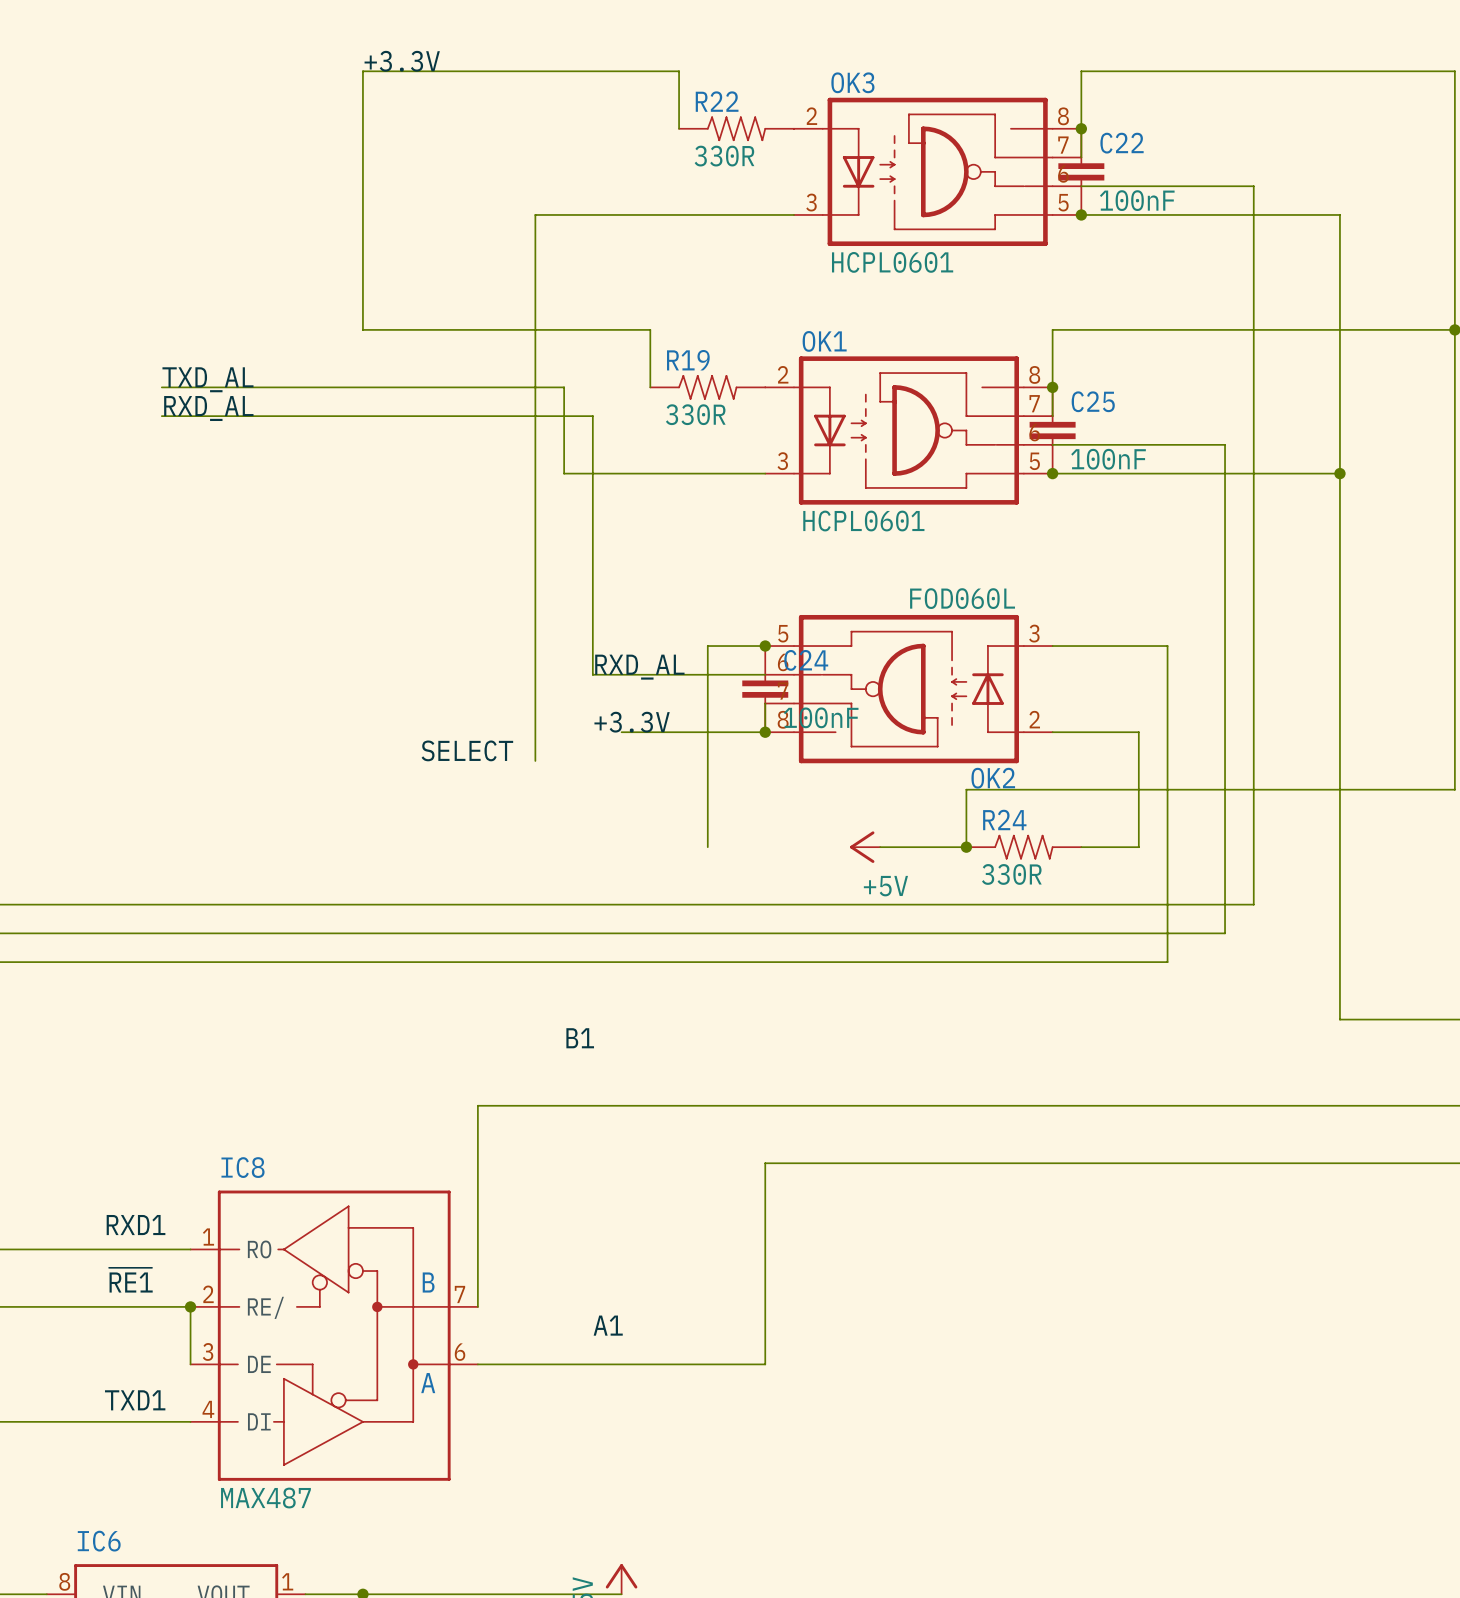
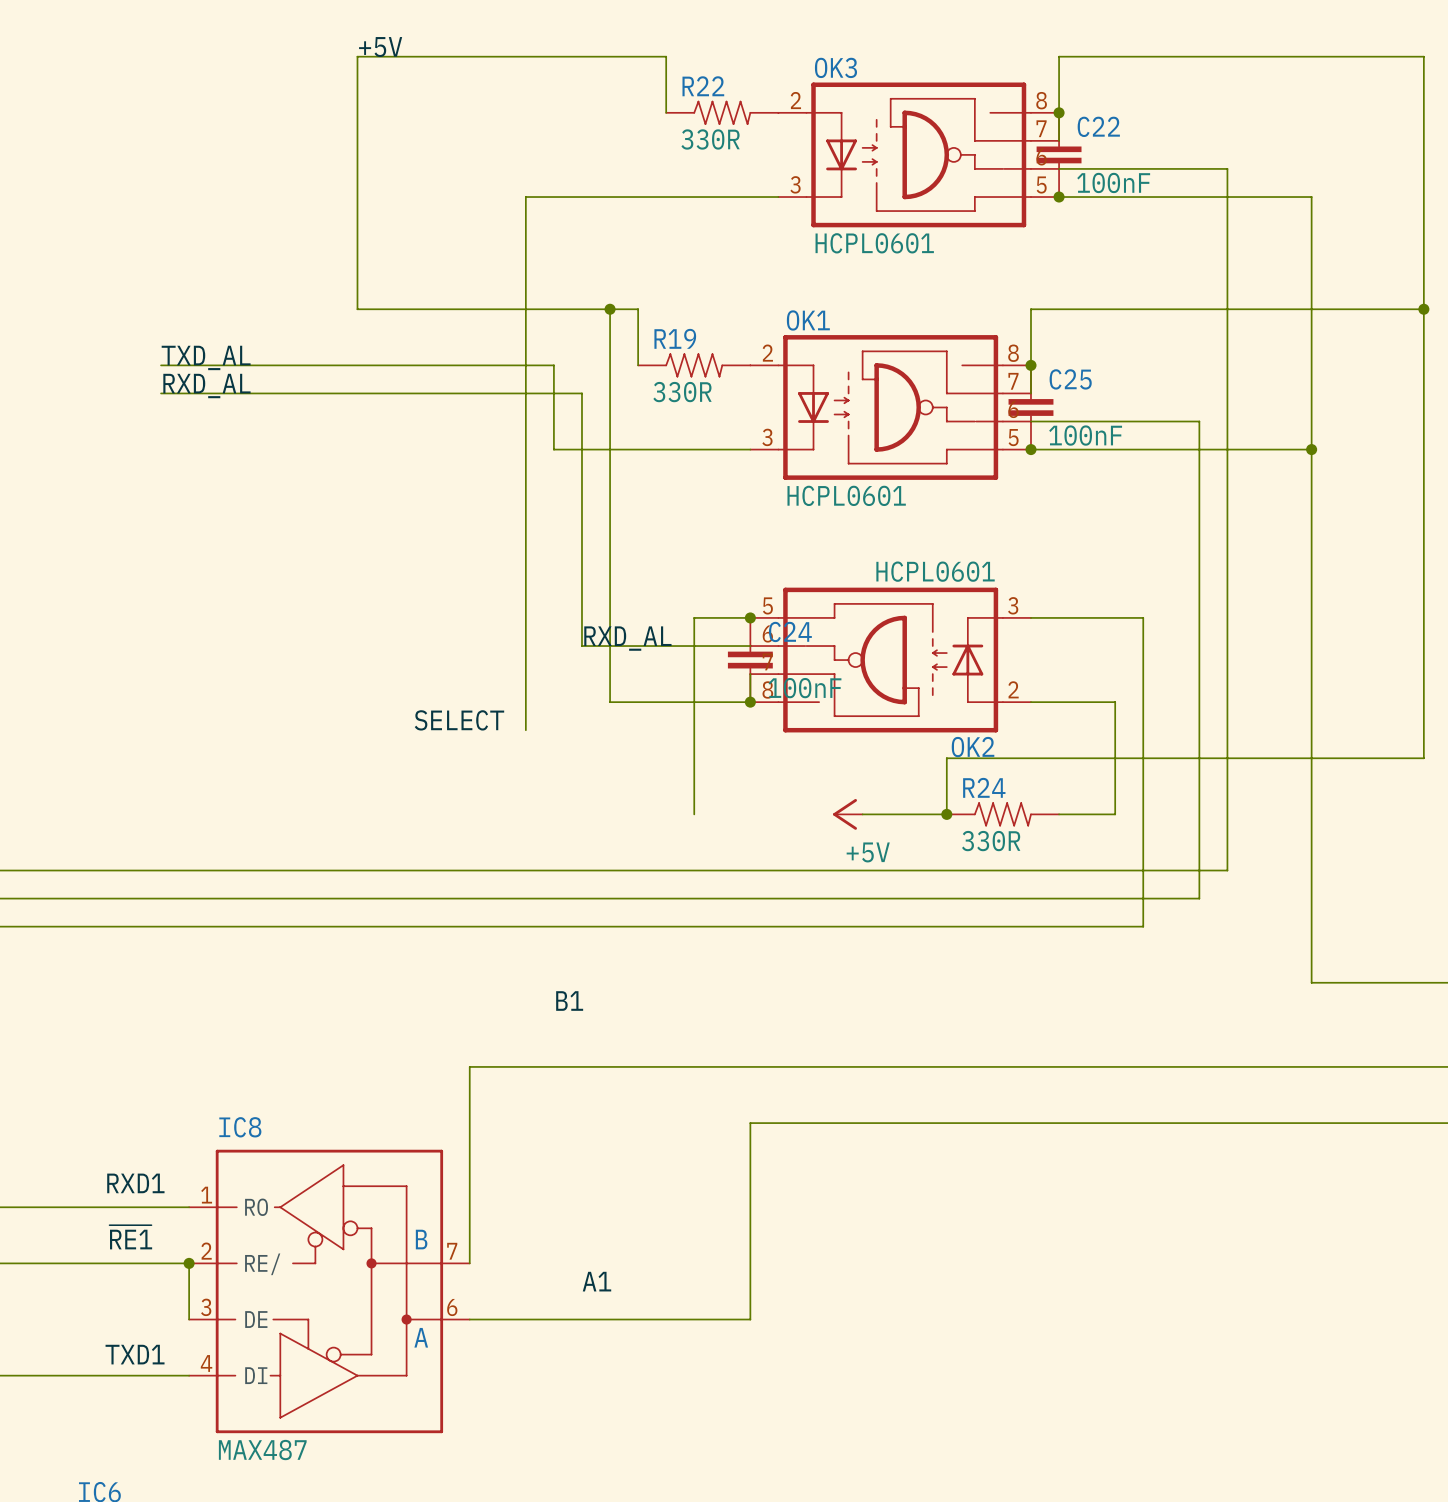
label: +3.3V (402, 61) -> +5V (380, 47)
wire: none -> (610, 309) (610, 702)
junction: none -> (610, 309)
OK2 value: FOD060L (962, 598) -> HCPL0601 (935, 571)
label: +3.3V (632, 722) -> none

